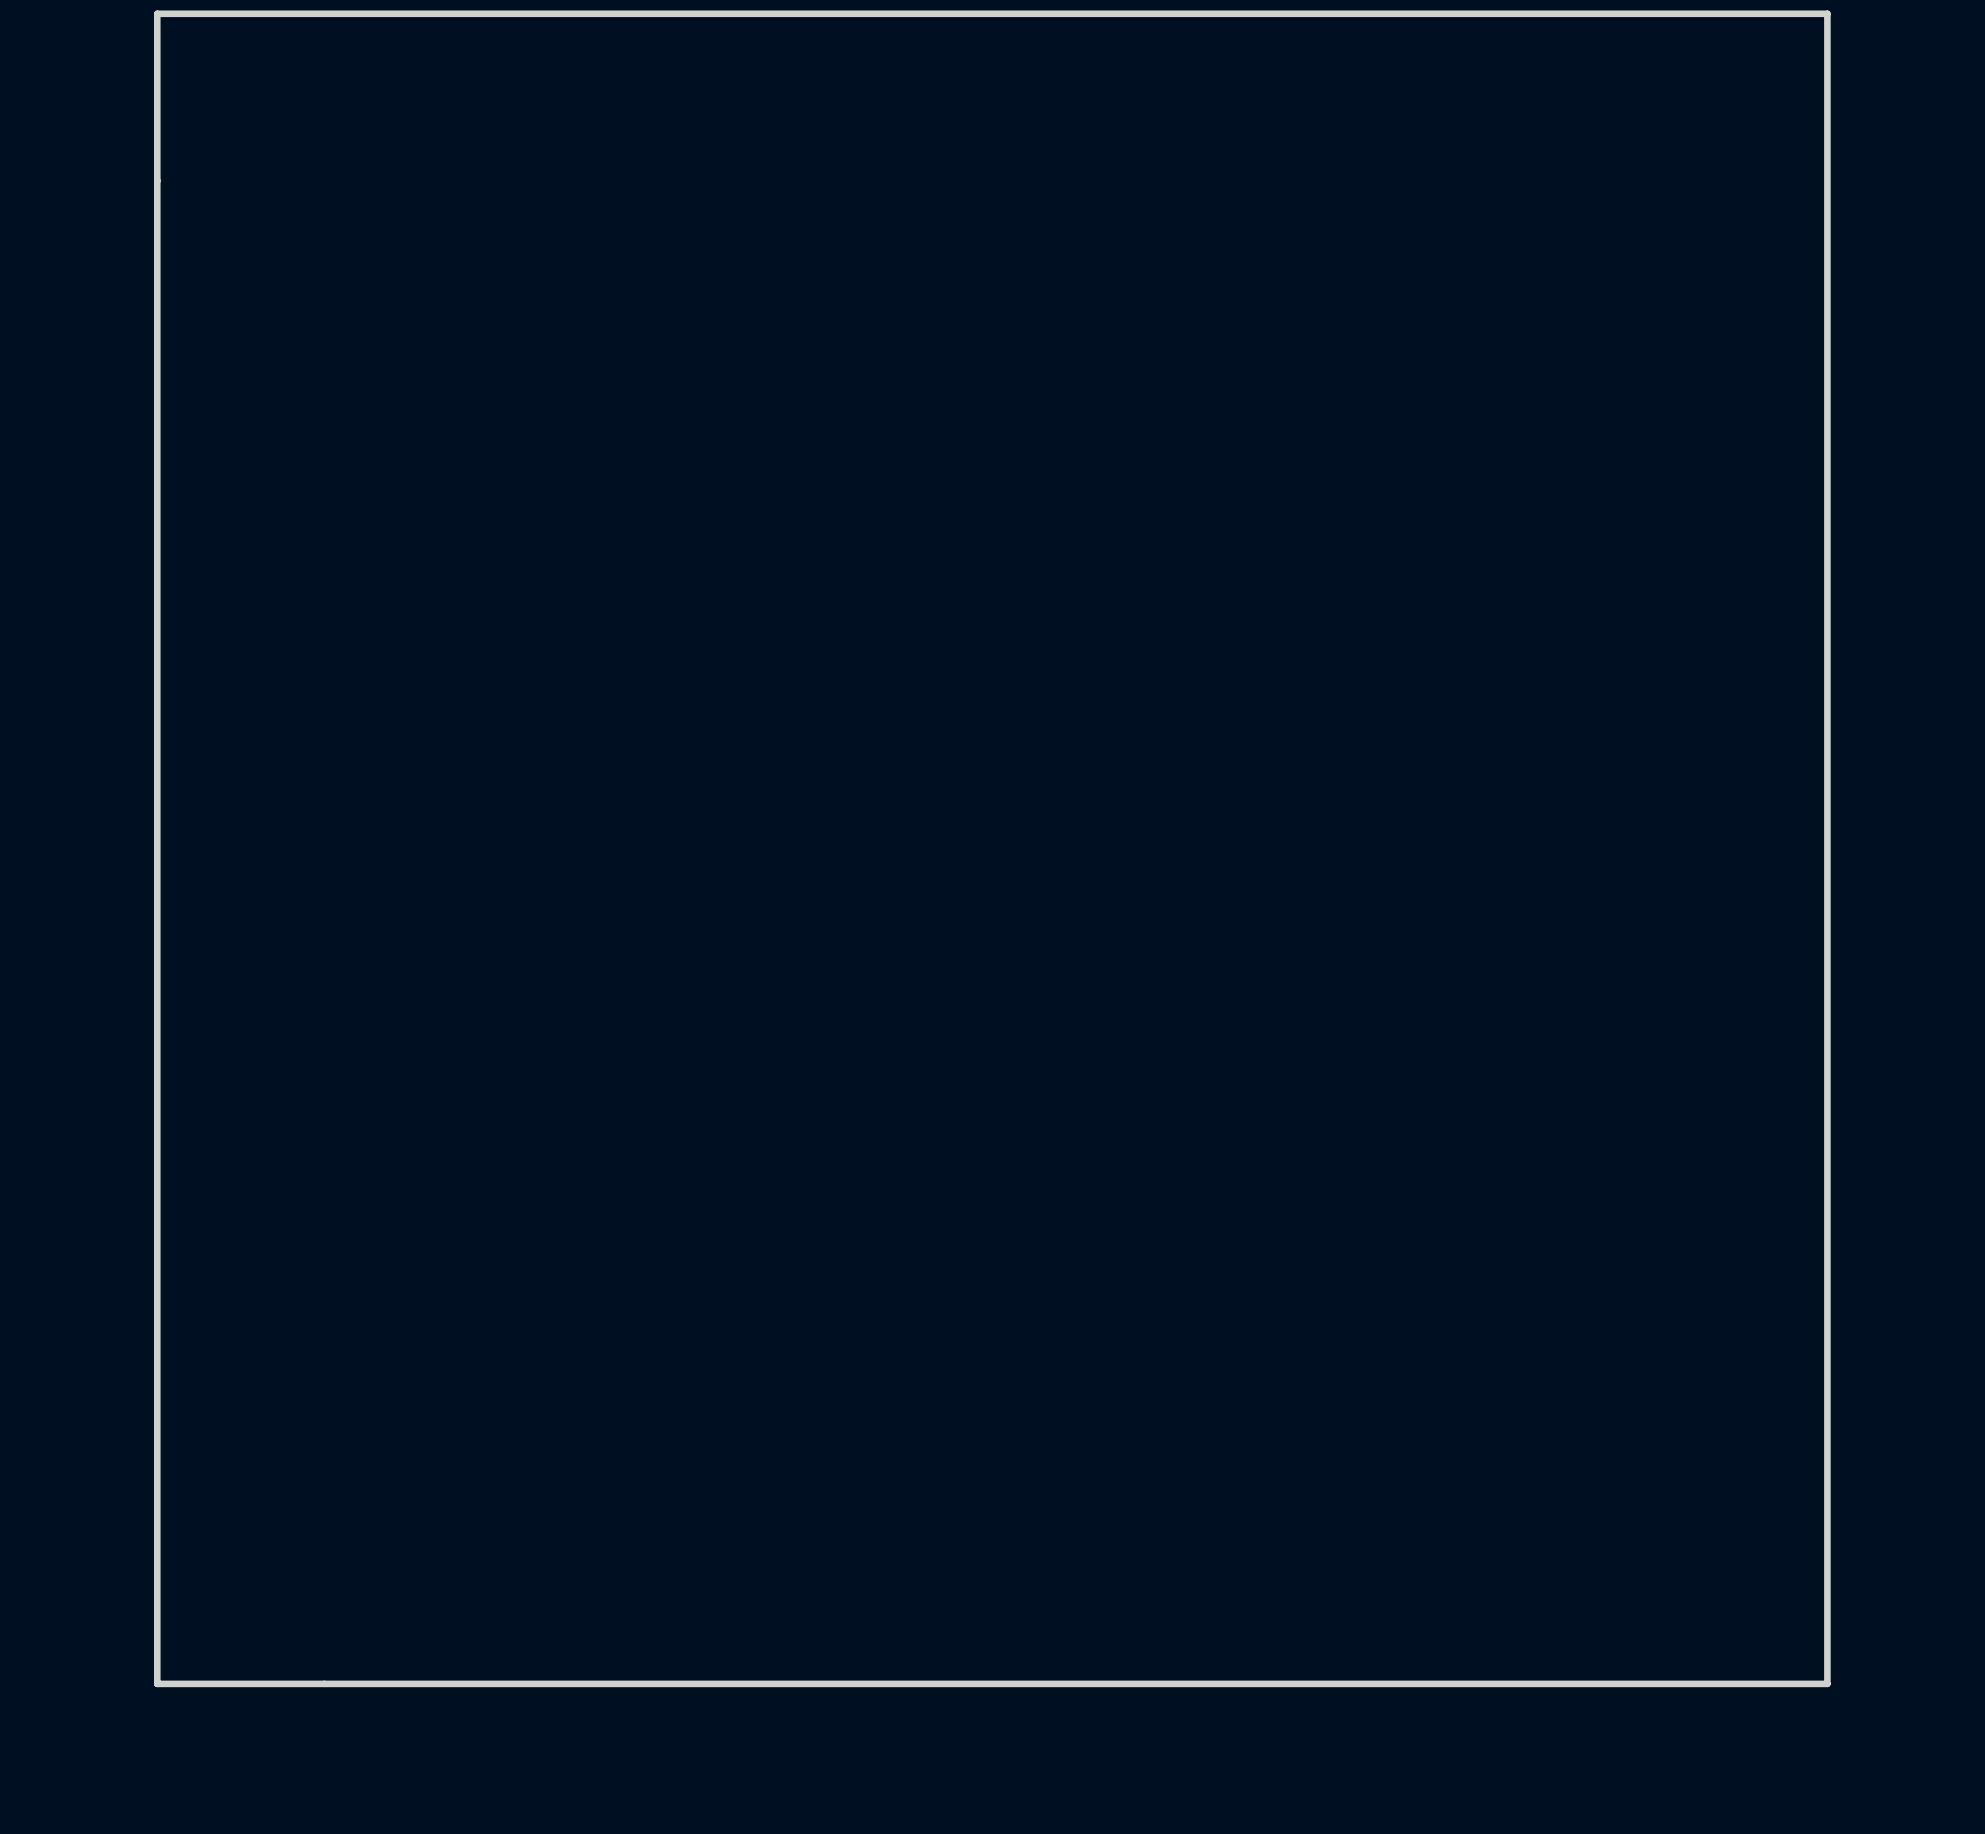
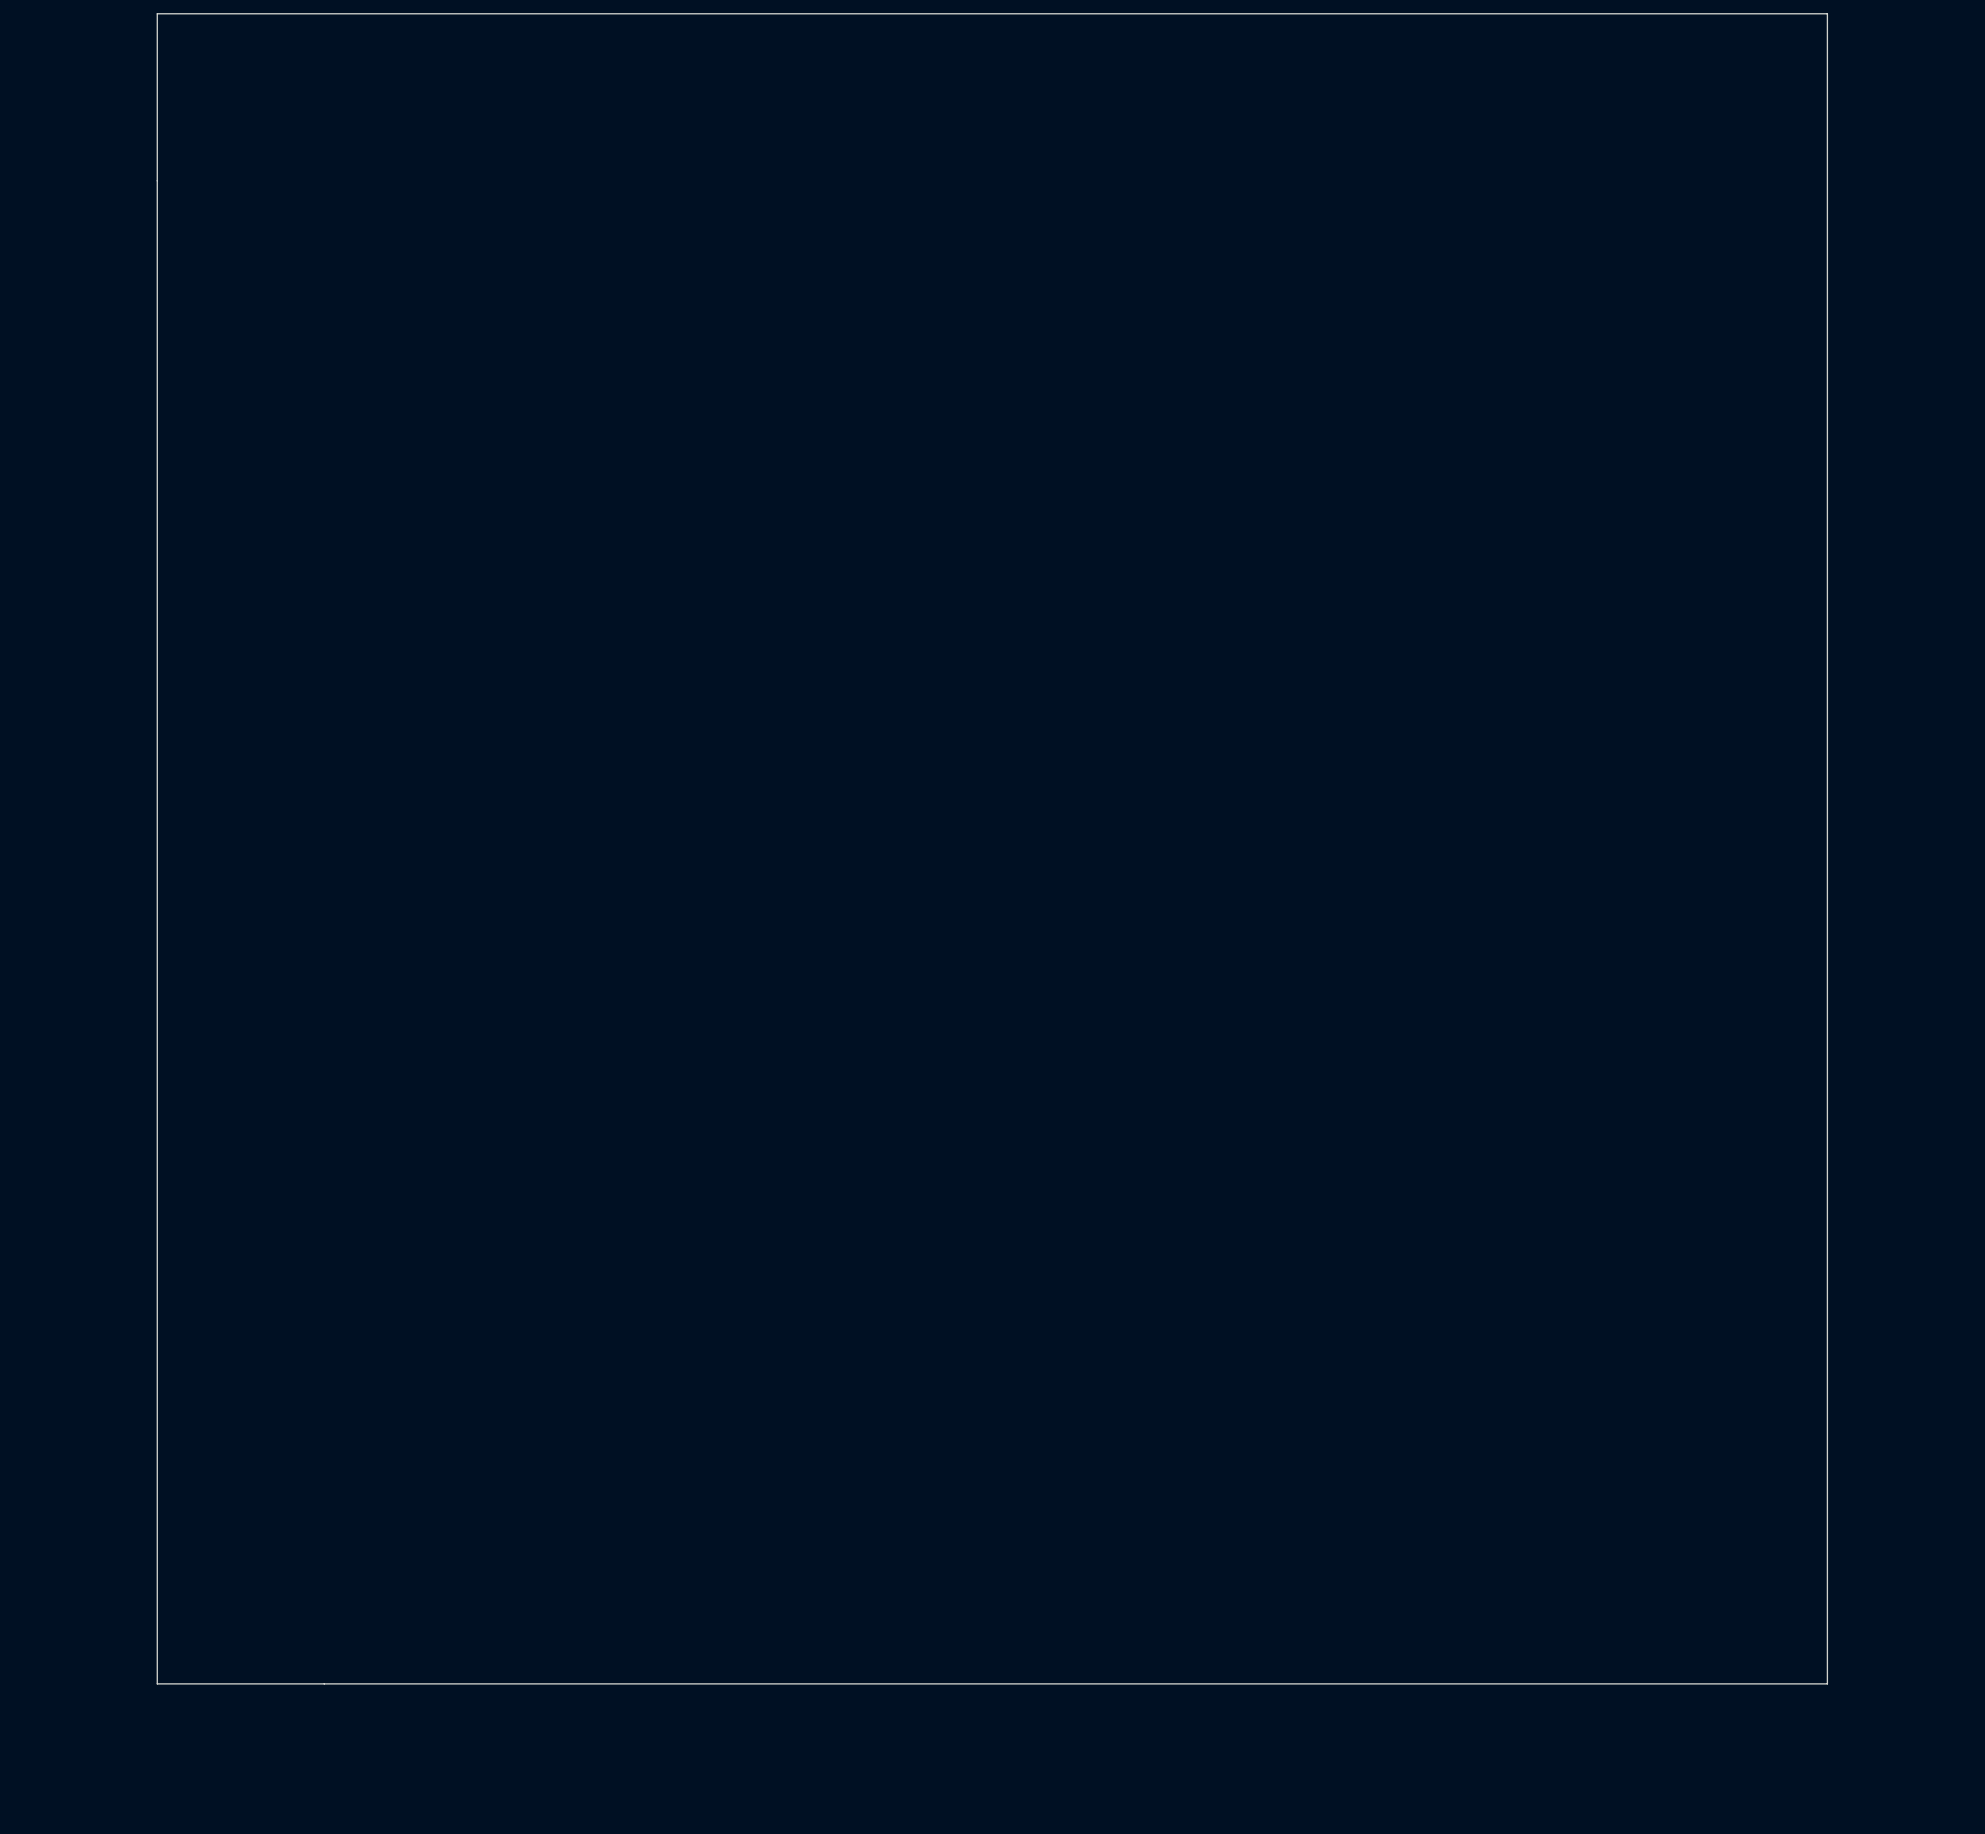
board edge width: thick (157, 13) (157, 1683) (1827, 1683) (1827, 13) (157, 13) -> thin (157, 13) (157, 1683) (1827, 1683) (1827, 13) (157, 13)

